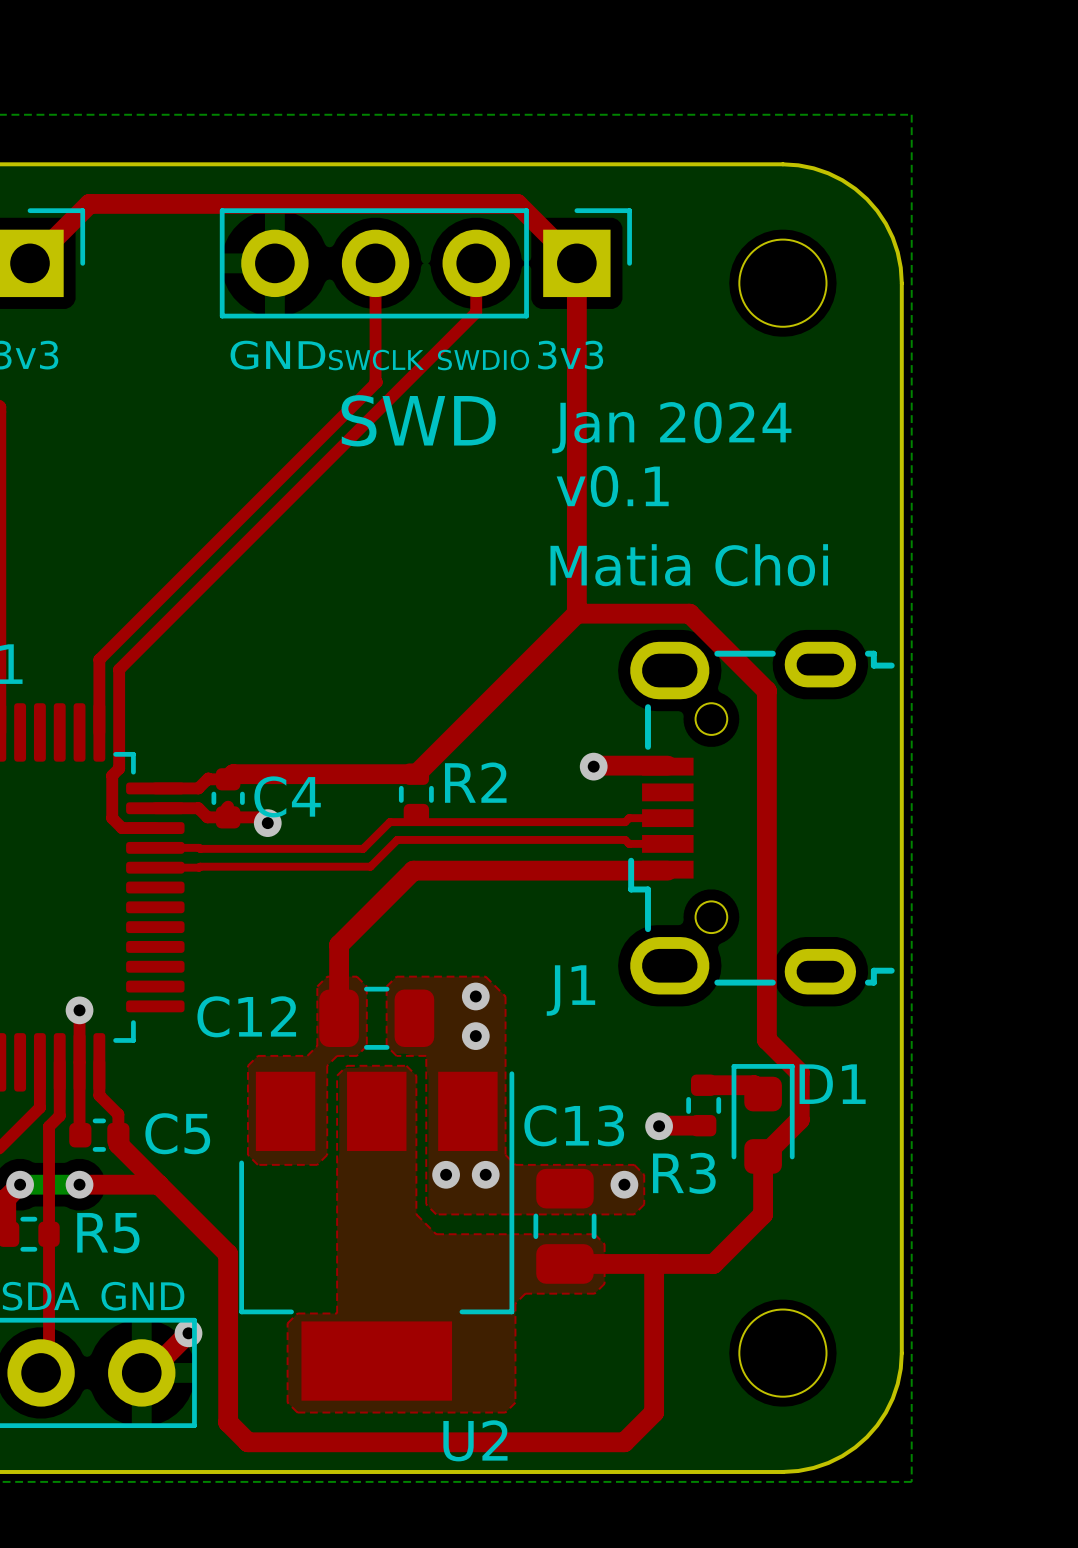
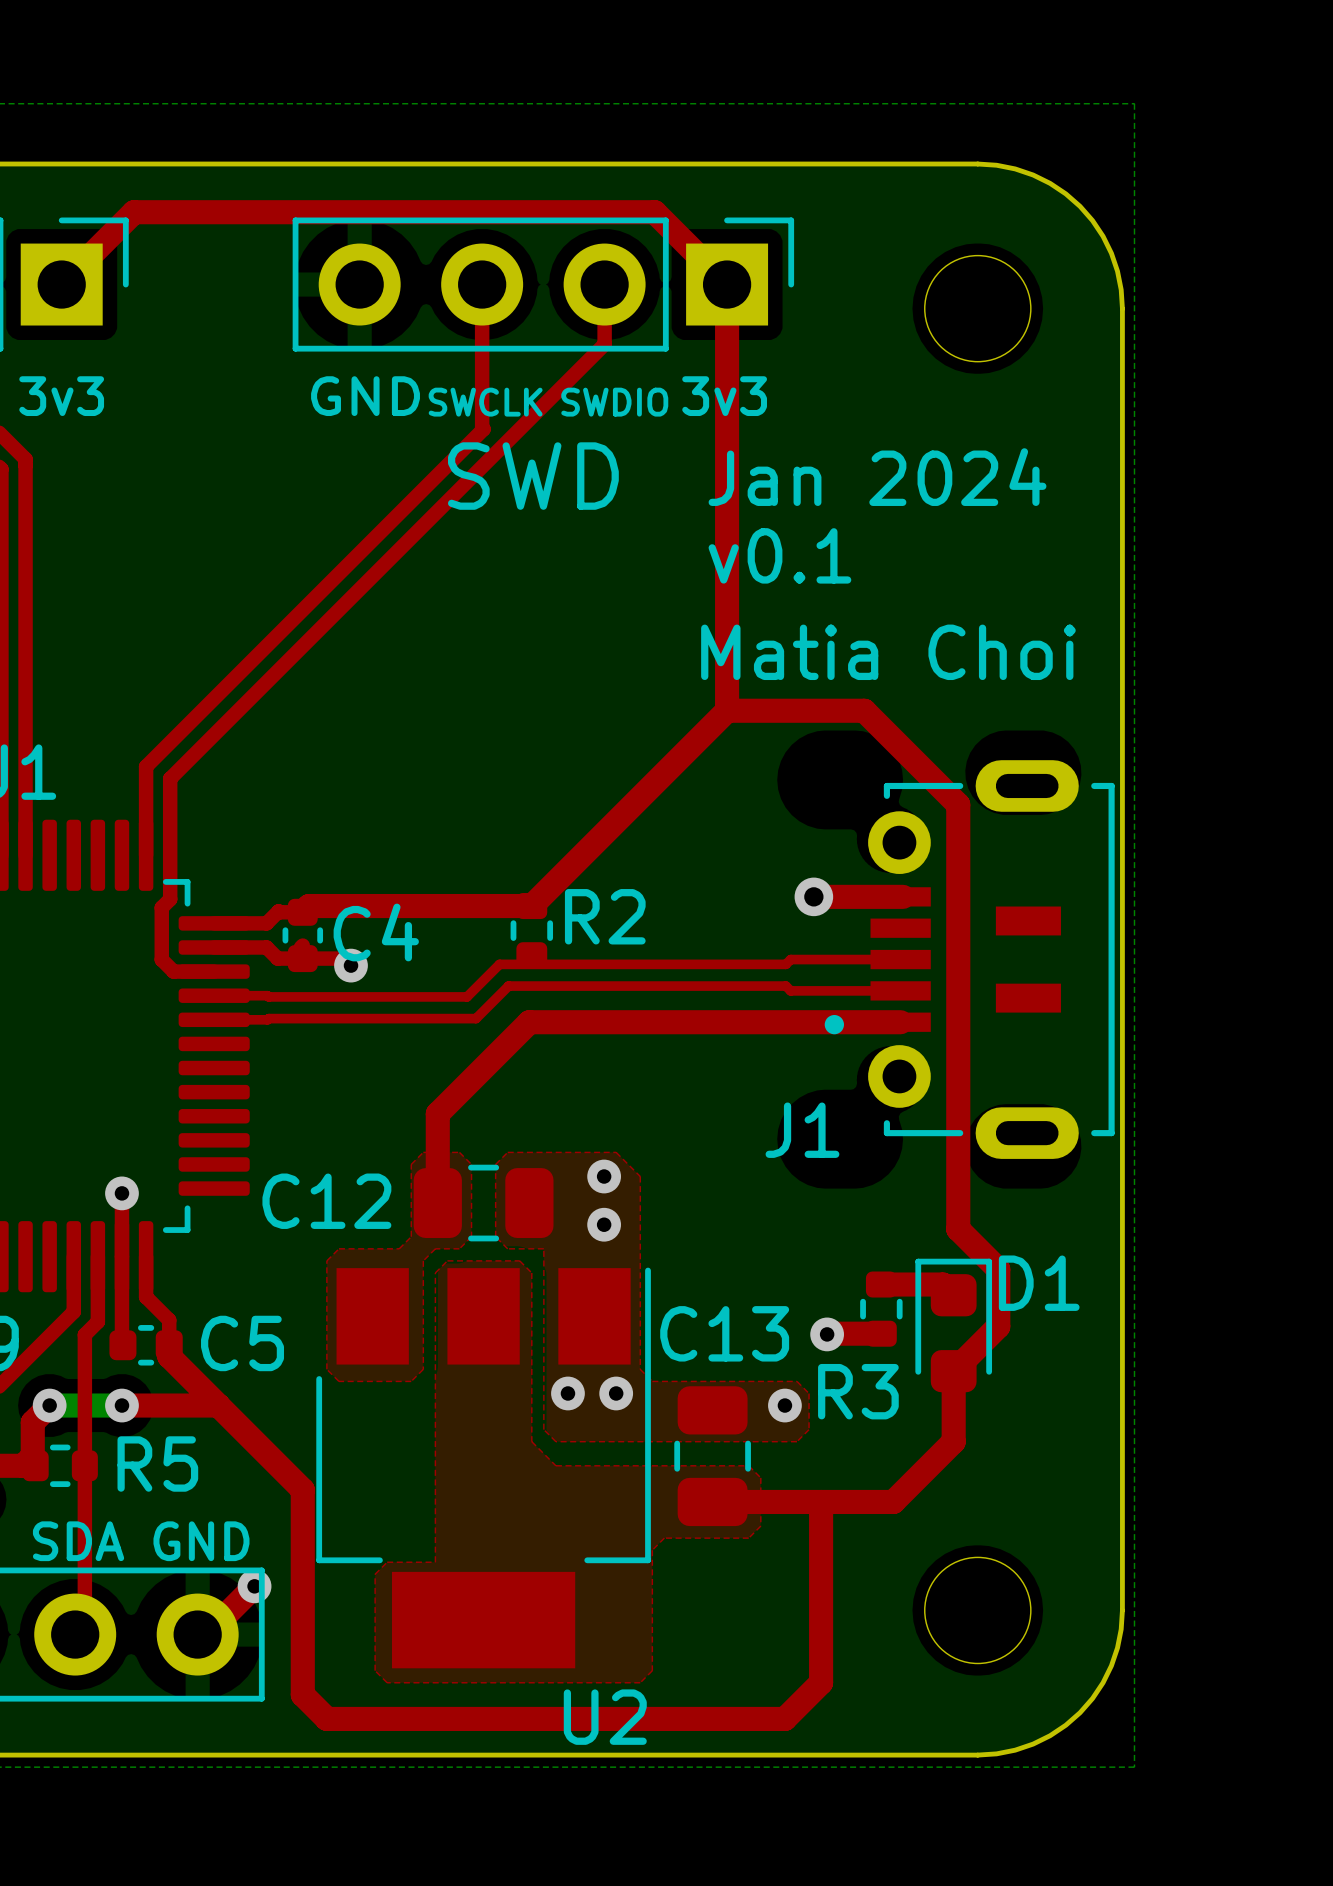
J1 footprint: [628, 641, 895, 995] -> [824, 760, 1115, 1159]
top track: (667, 765) (593, 766) -> none
via: (593, 766) -> none
top track: none -> (813, 896) (903, 896)
via: none -> (813, 896)
top track: none -> (837, 959) (903, 959)
top track: none -> (837, 990) (903, 990)
top track: (413, 870) (667, 870) -> (528, 1023) (900, 1022)

